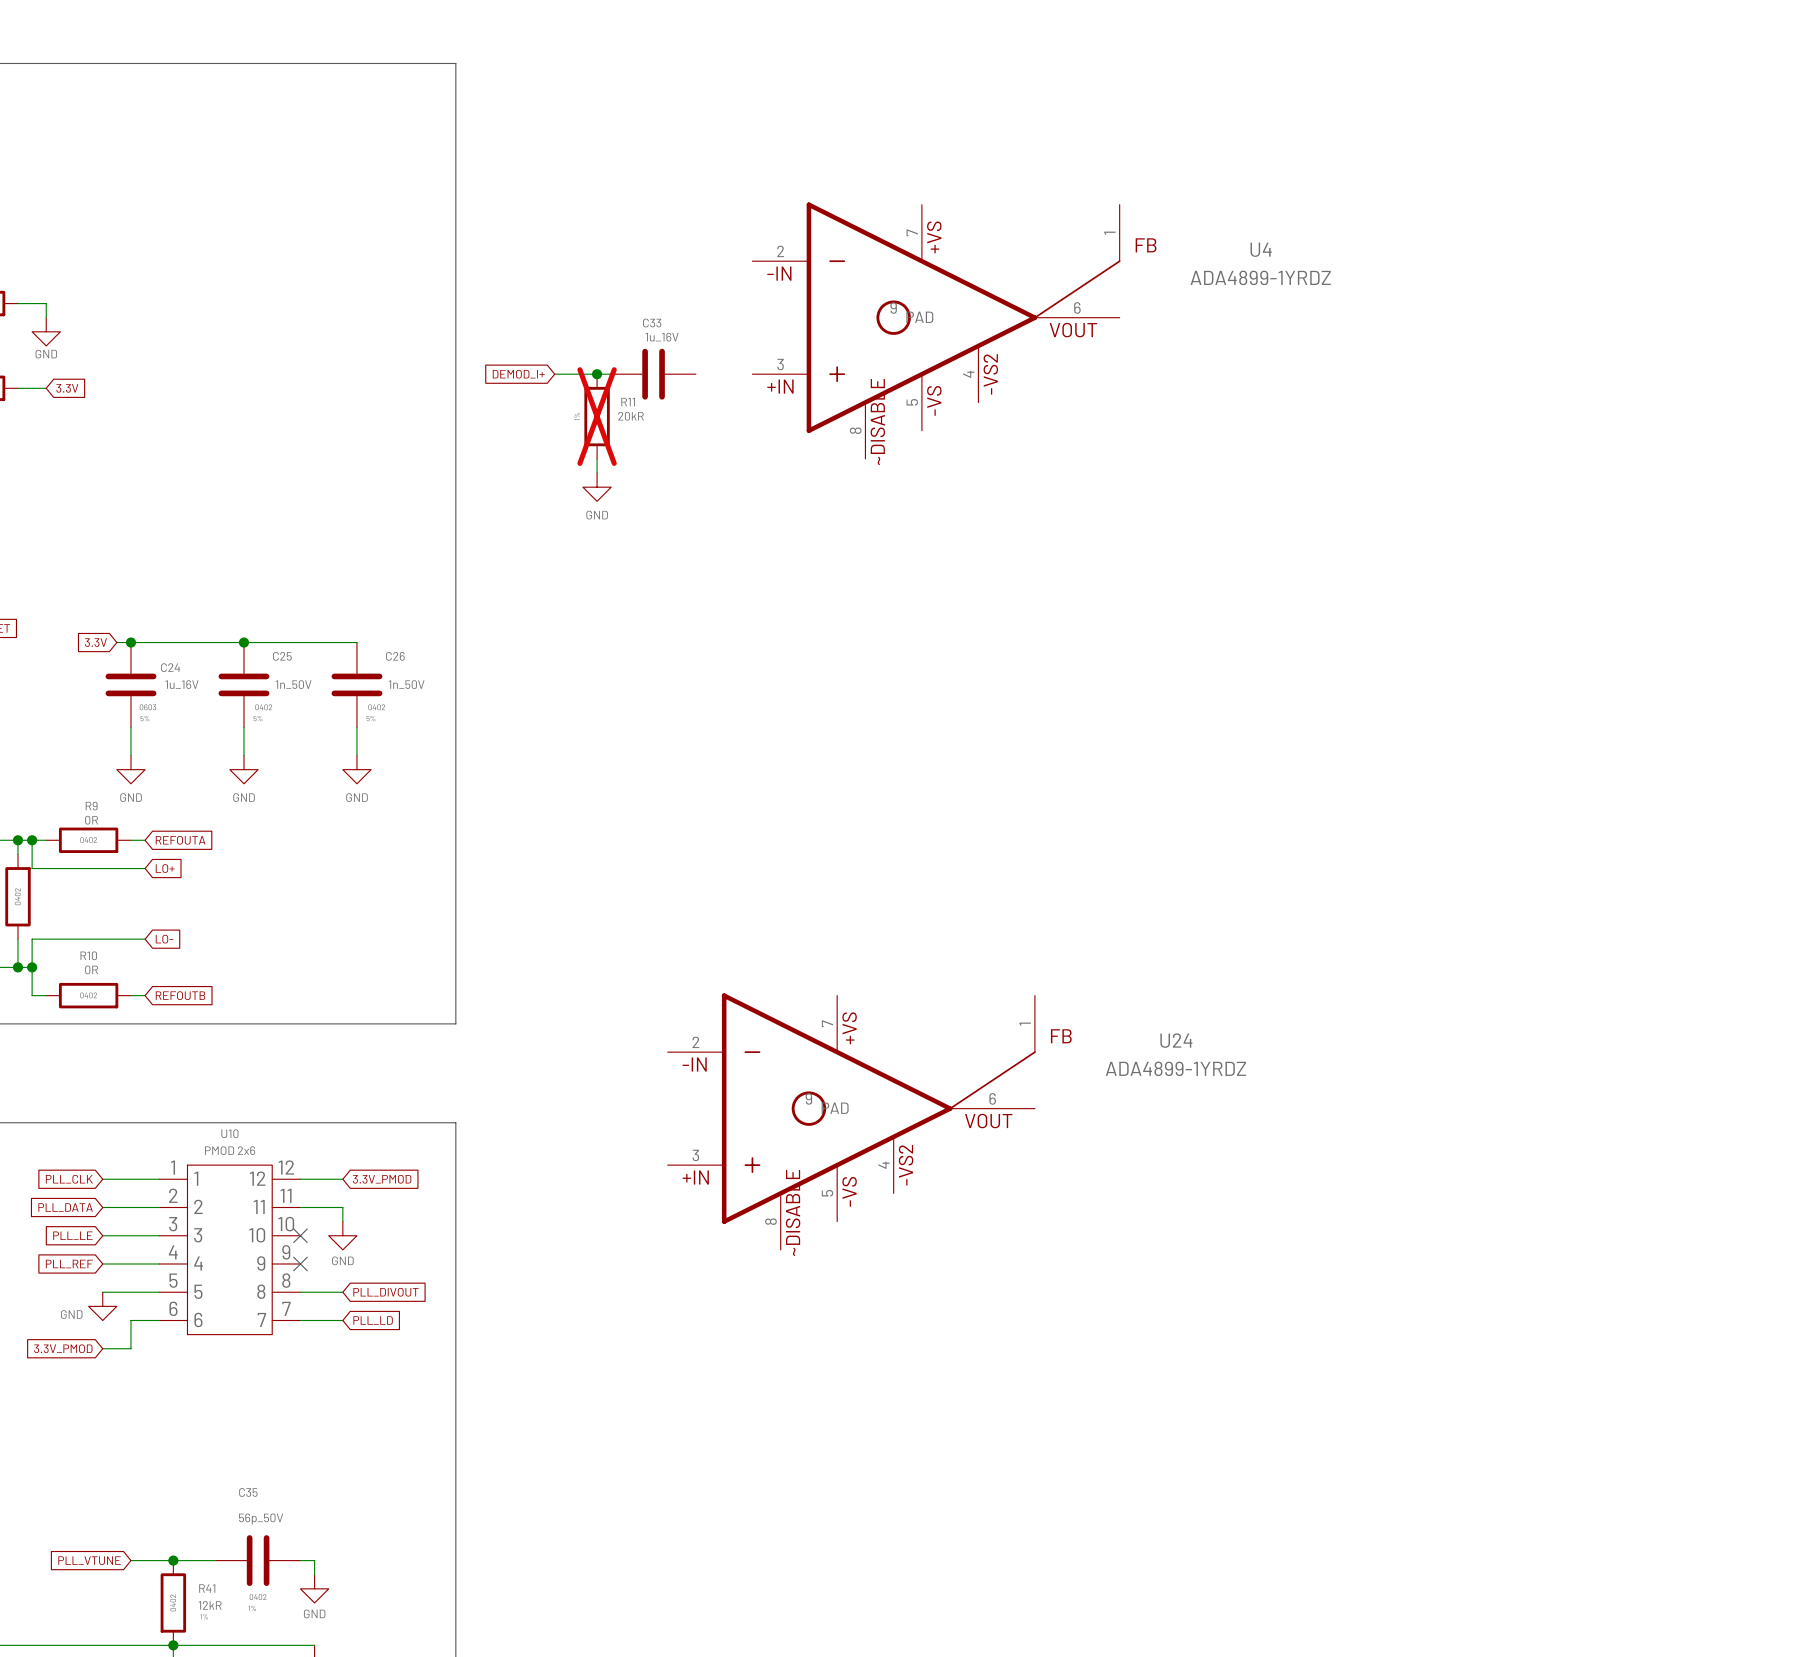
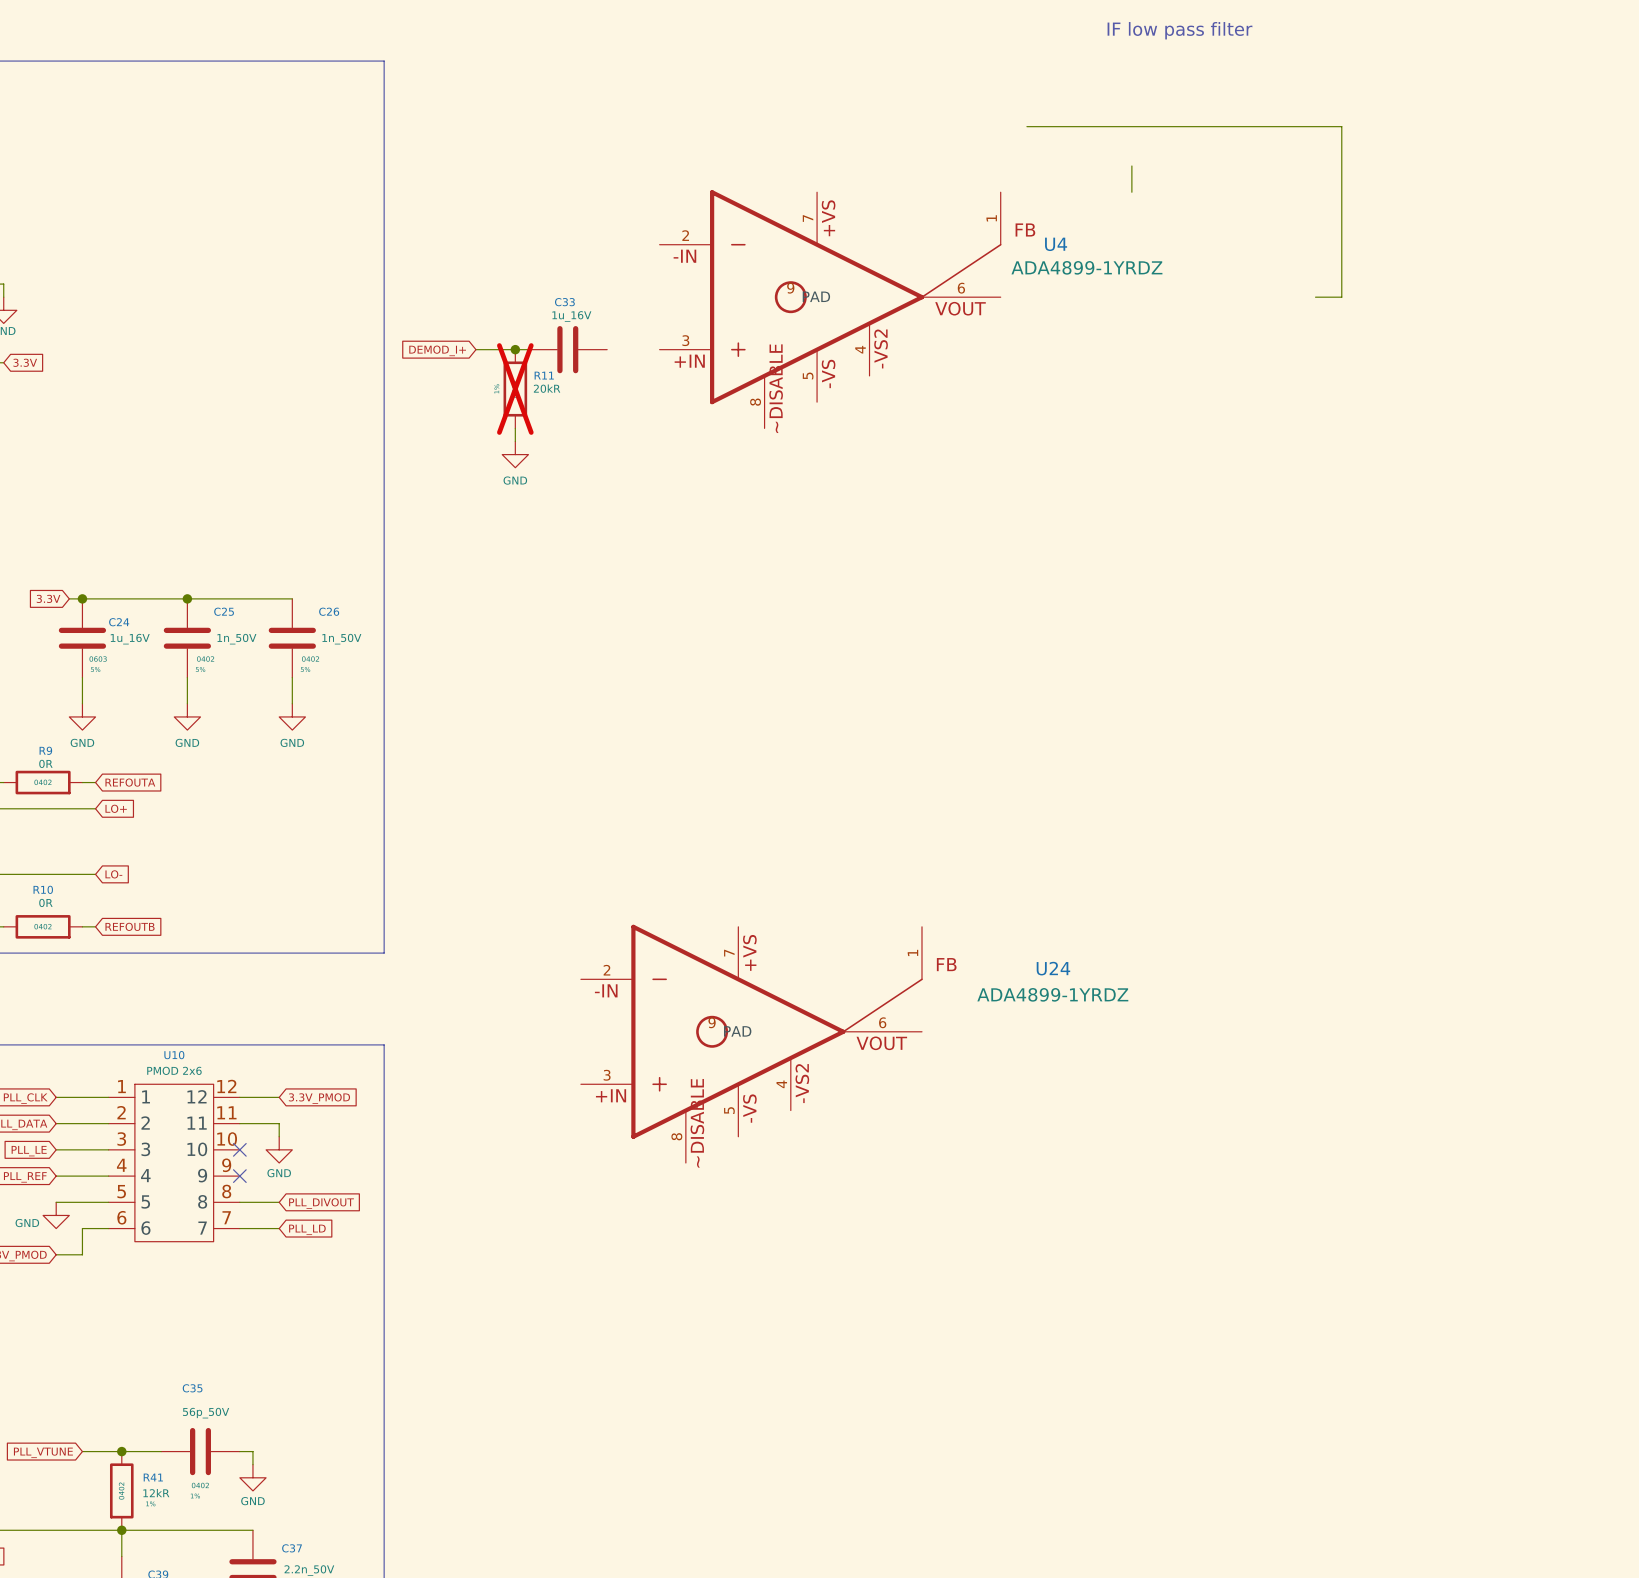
text: none -> IF low pass filter (1179, 30)
wire: none -> (1026, 126) (1341, 126) (1341, 297) (1315, 297)
wire: none -> (1131, 166) (1131, 192)
U4 name position: U4 (1261, 249) -> U4 (1056, 244)
U4 value position: ADA4899-1YRDZ (1260, 277) -> ADA4899-1YRDZ (1086, 267)

